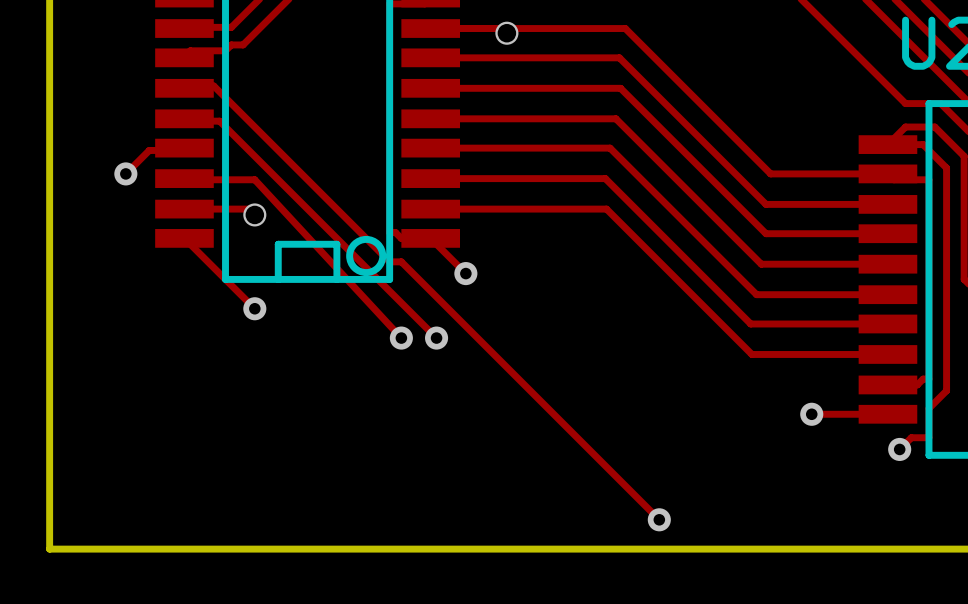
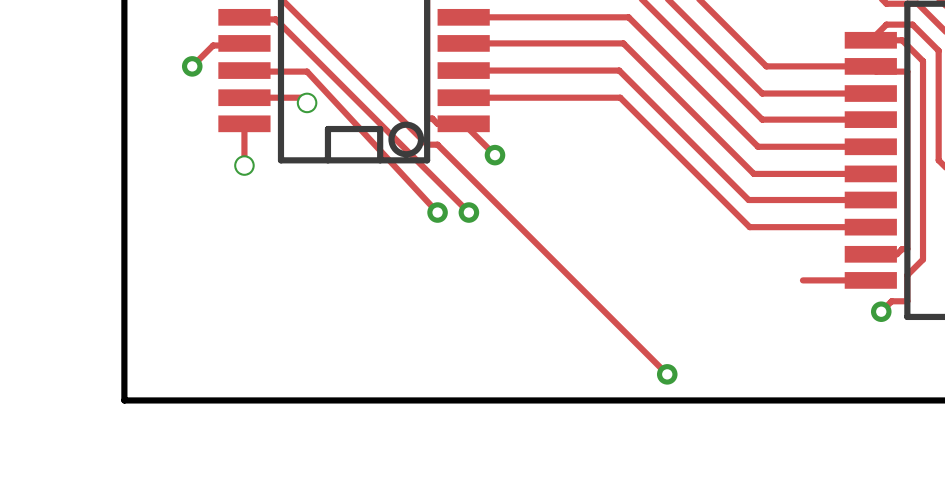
track: (184, 238) (254, 308) -> (244, 123) (244, 165)
via: none -> (244, 165)
via: (254, 308) -> none
via: (811, 414) -> none

